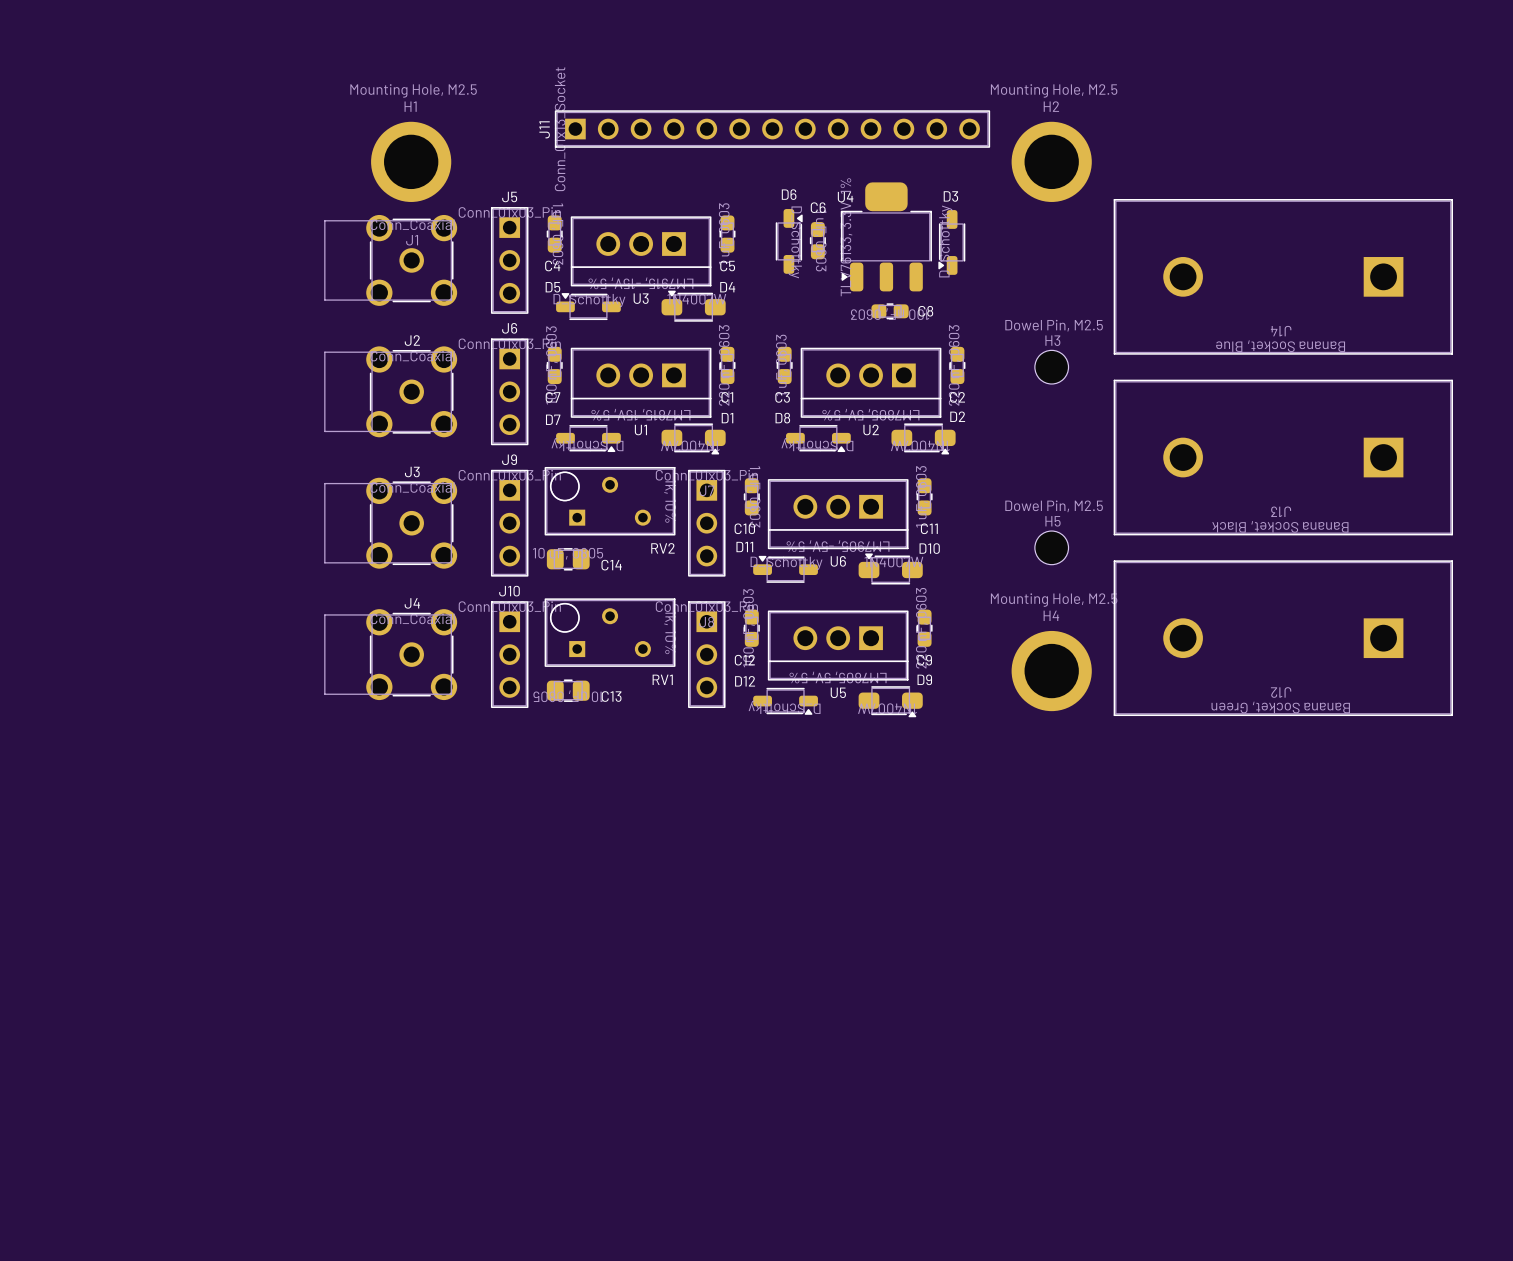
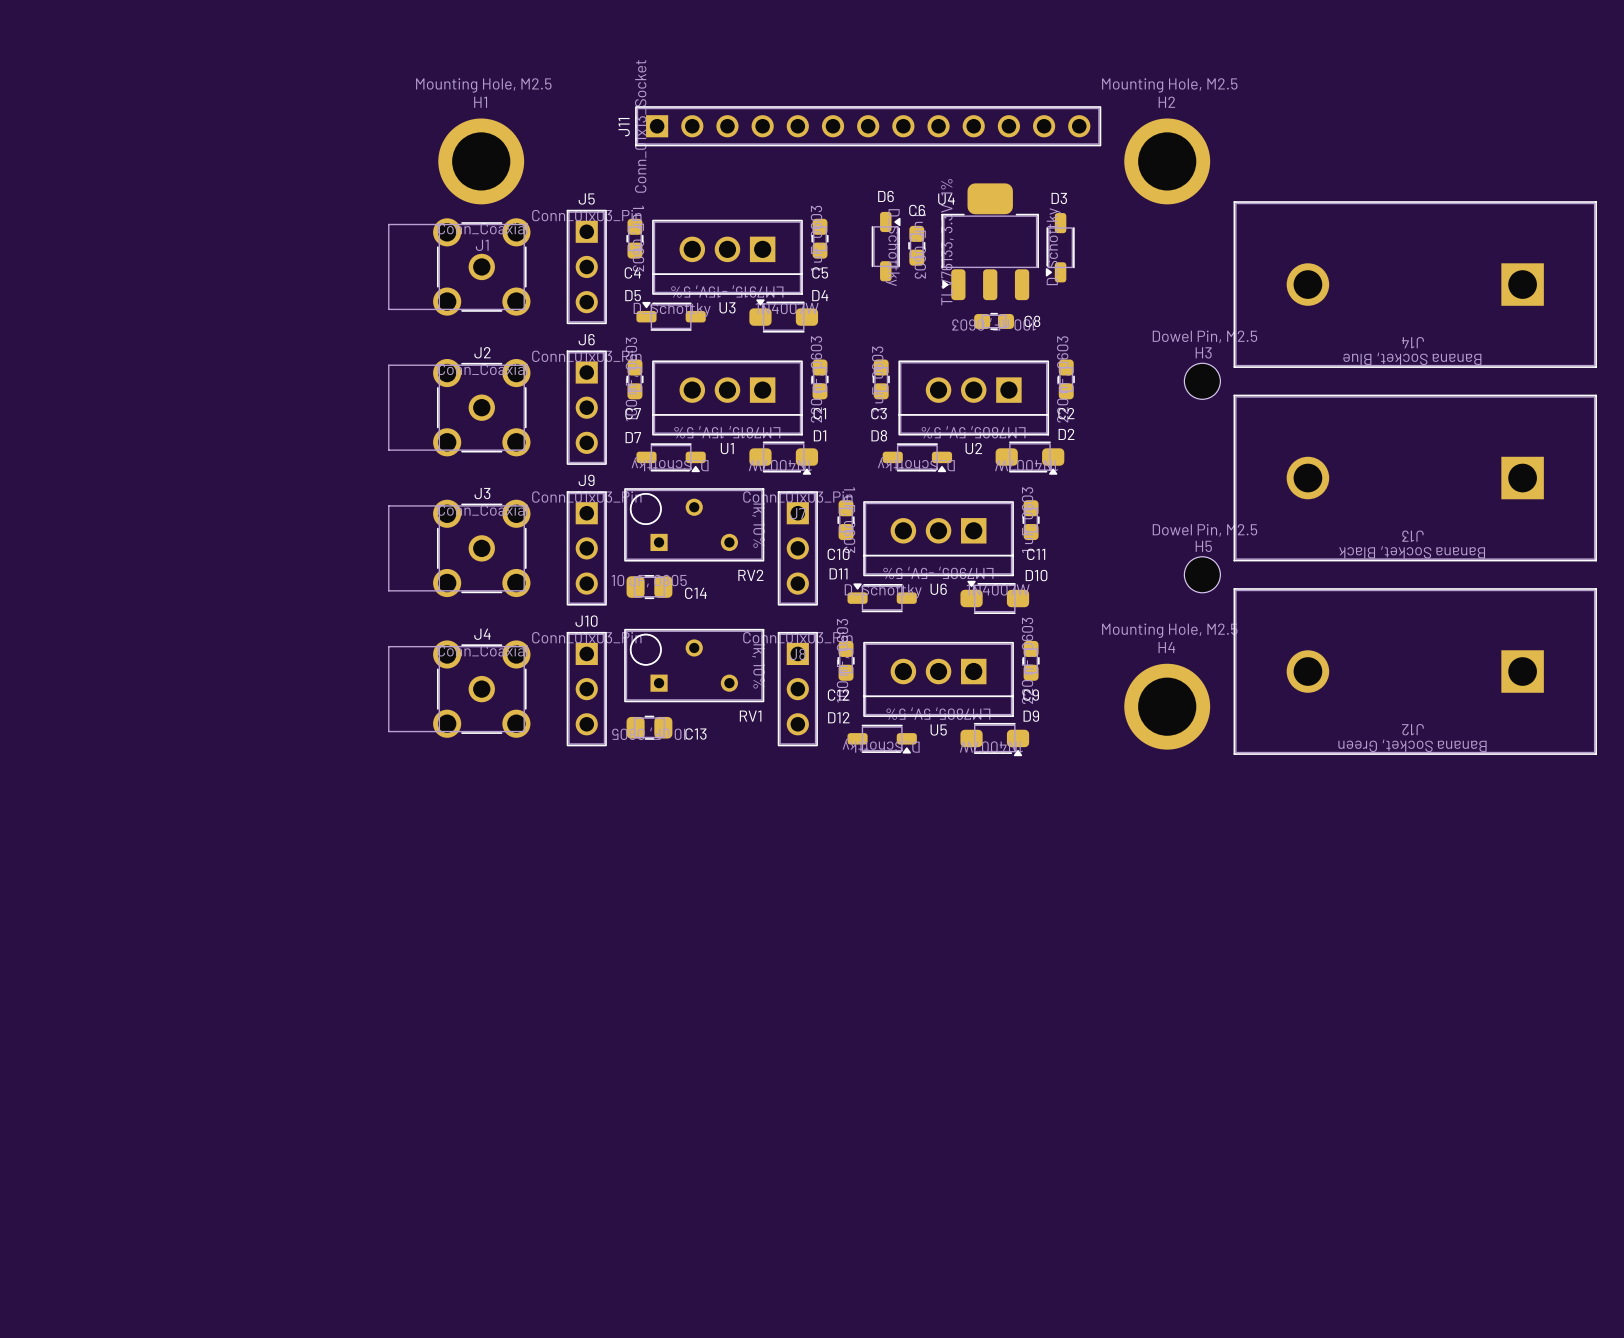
H3 position: (1051, 367) -> (1202, 381)
H5 position: (1051, 547) -> (1202, 574)

